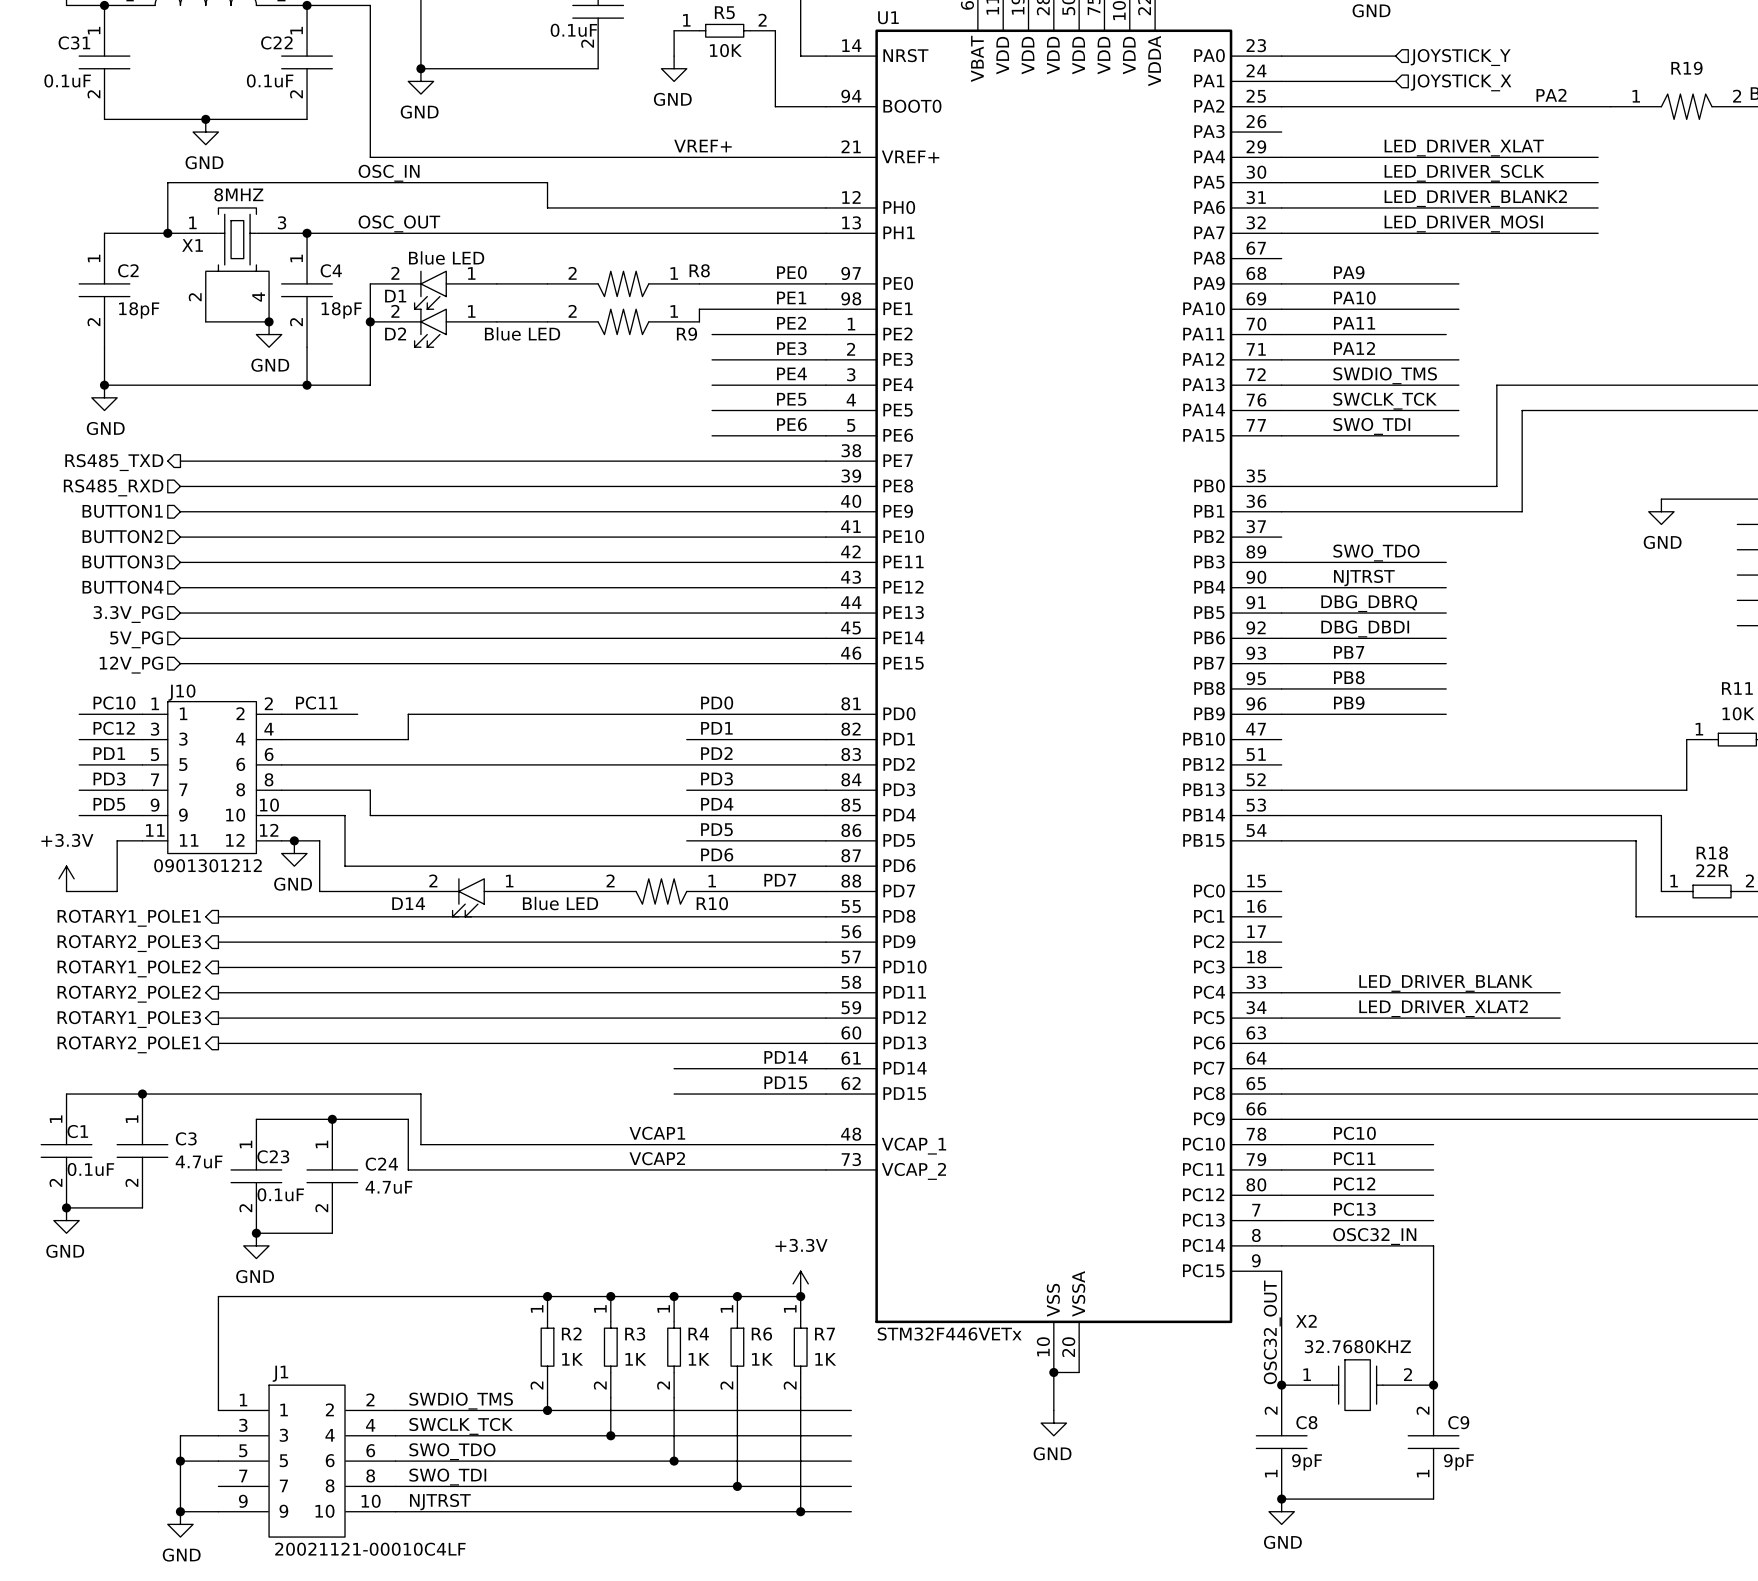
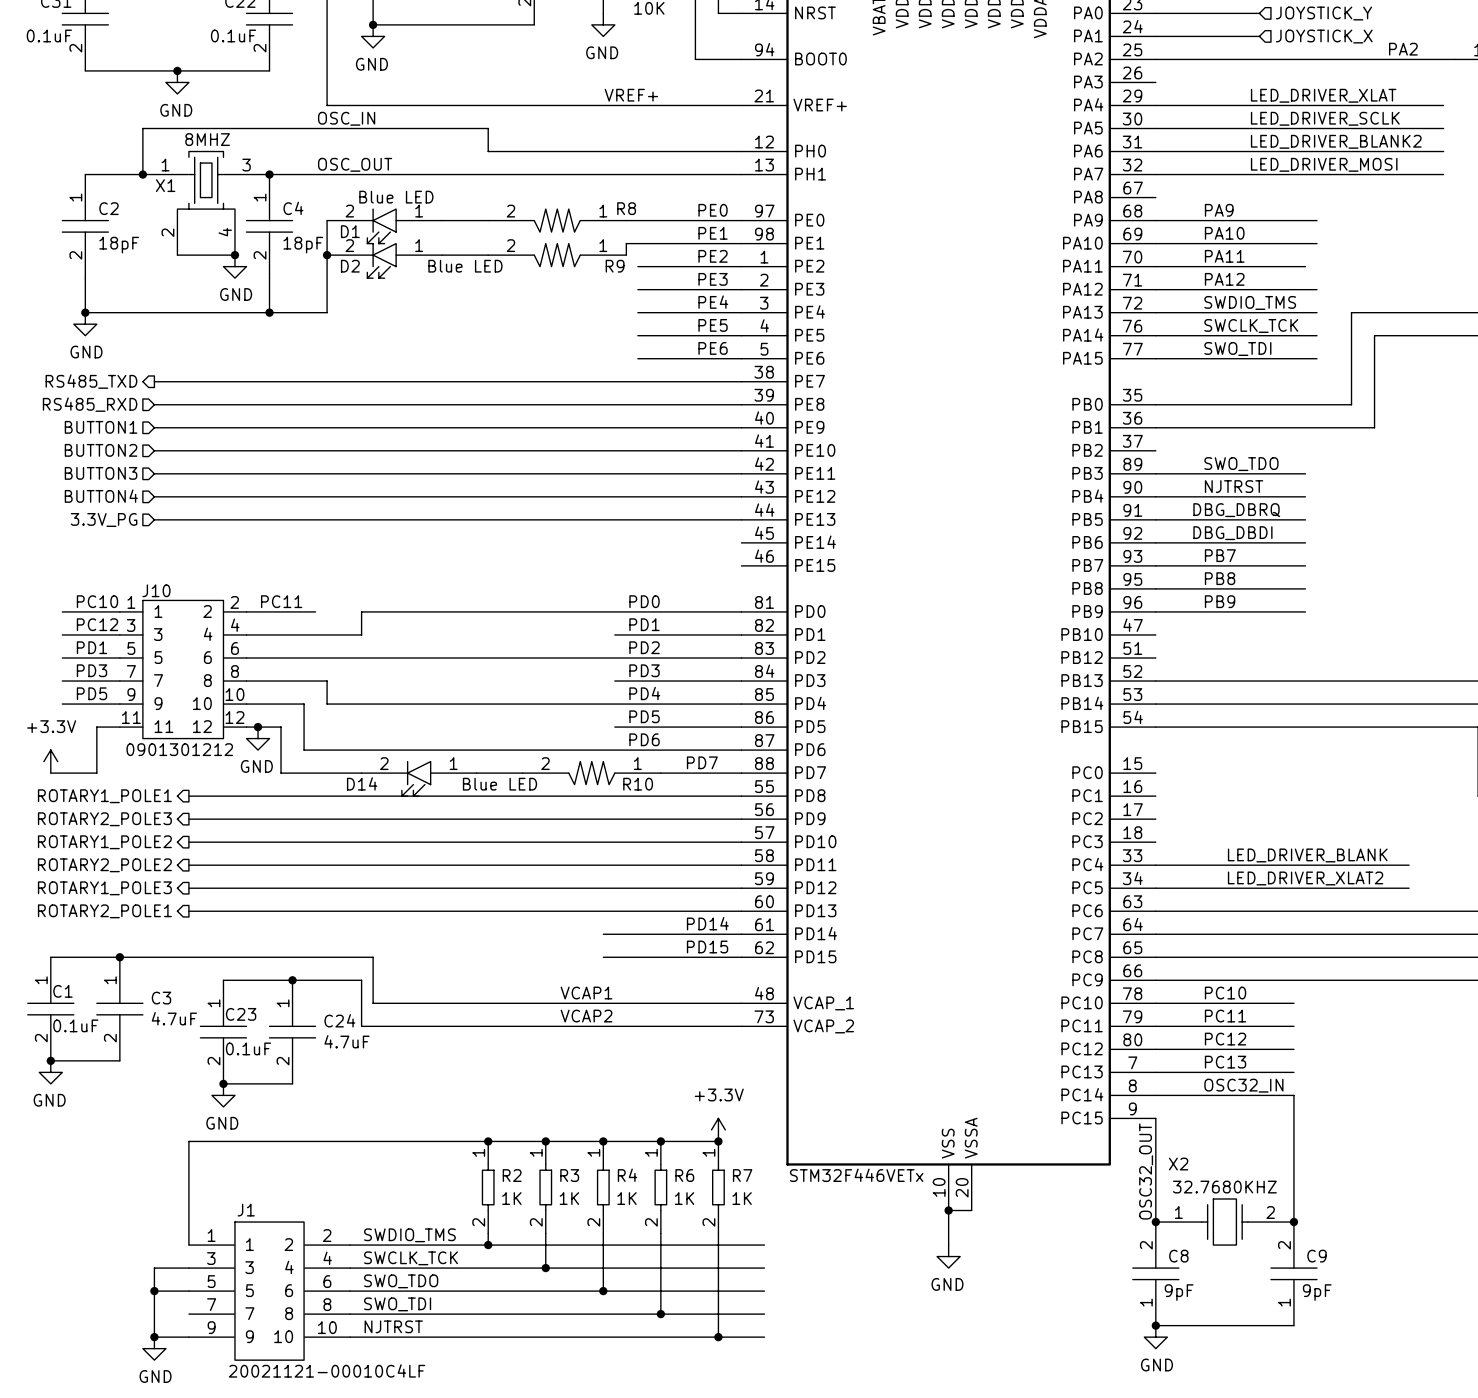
wire: (180, 638) (825, 638) -> none
hierarchical label: 5V_PG (136, 639) -> none
wire: (180, 663) (825, 663) -> none
hierarchical label: 12V_PG (131, 665) -> none

